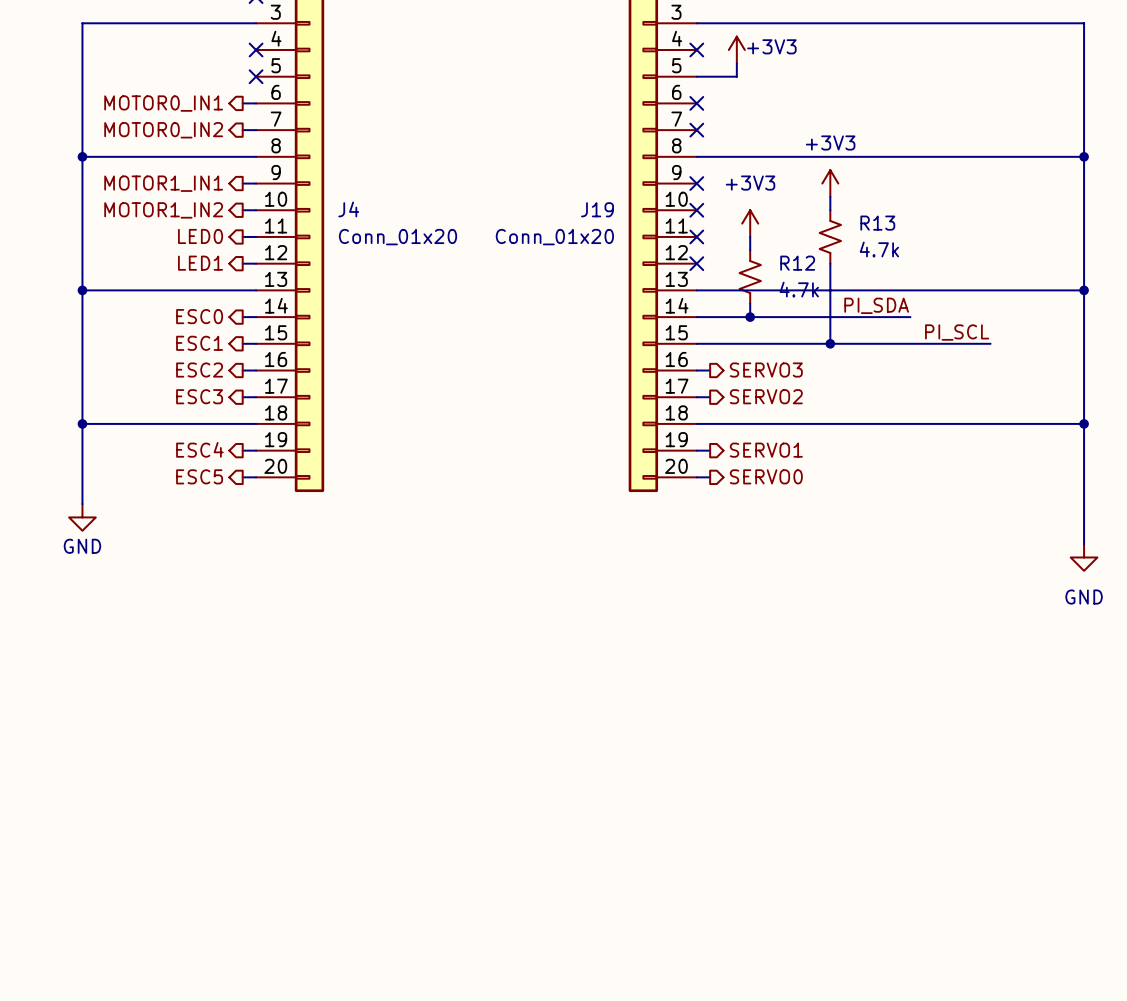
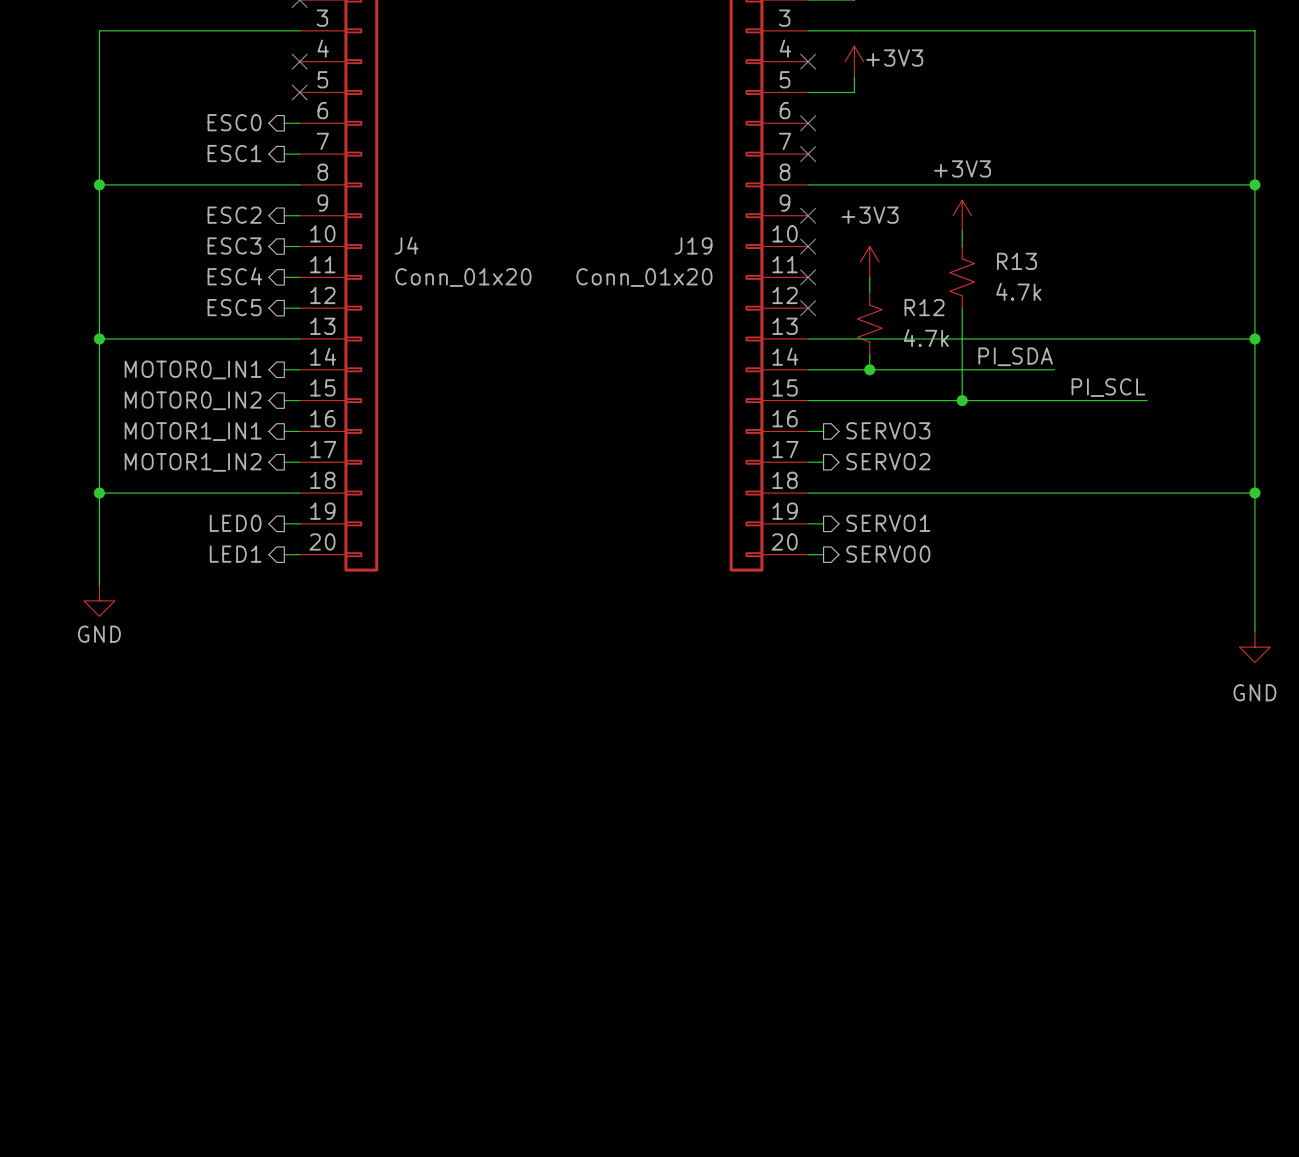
hierarchical label: MOTOR0_IN1 (163, 103) -> ESC0 (234, 122)
hierarchical label: MOTOR0_IN2 (163, 130) -> ESC1 (234, 153)
hierarchical label: MOTOR1_IN1 (163, 183) -> ESC2 (234, 215)
hierarchical label: MOTOR1_IN2 (163, 210) -> ESC3 (234, 245)
hierarchical label: LED0 (200, 236) -> ESC4 (234, 276)
hierarchical label: LED1 (200, 263) -> ESC5 (234, 307)
hierarchical label: ESC0 (199, 316) -> MOTOR0_IN1 (193, 369)
hierarchical label: ESC1 (199, 343) -> MOTOR0_IN2 (193, 400)
hierarchical label: ESC2 (199, 370) -> MOTOR1_IN1 (193, 431)
hierarchical label: ESC3 (199, 396) -> MOTOR1_IN2 (193, 462)
hierarchical label: ESC4 (199, 449) -> LED0 (235, 523)
hierarchical label: ESC5 (199, 476) -> LED1 (235, 554)

